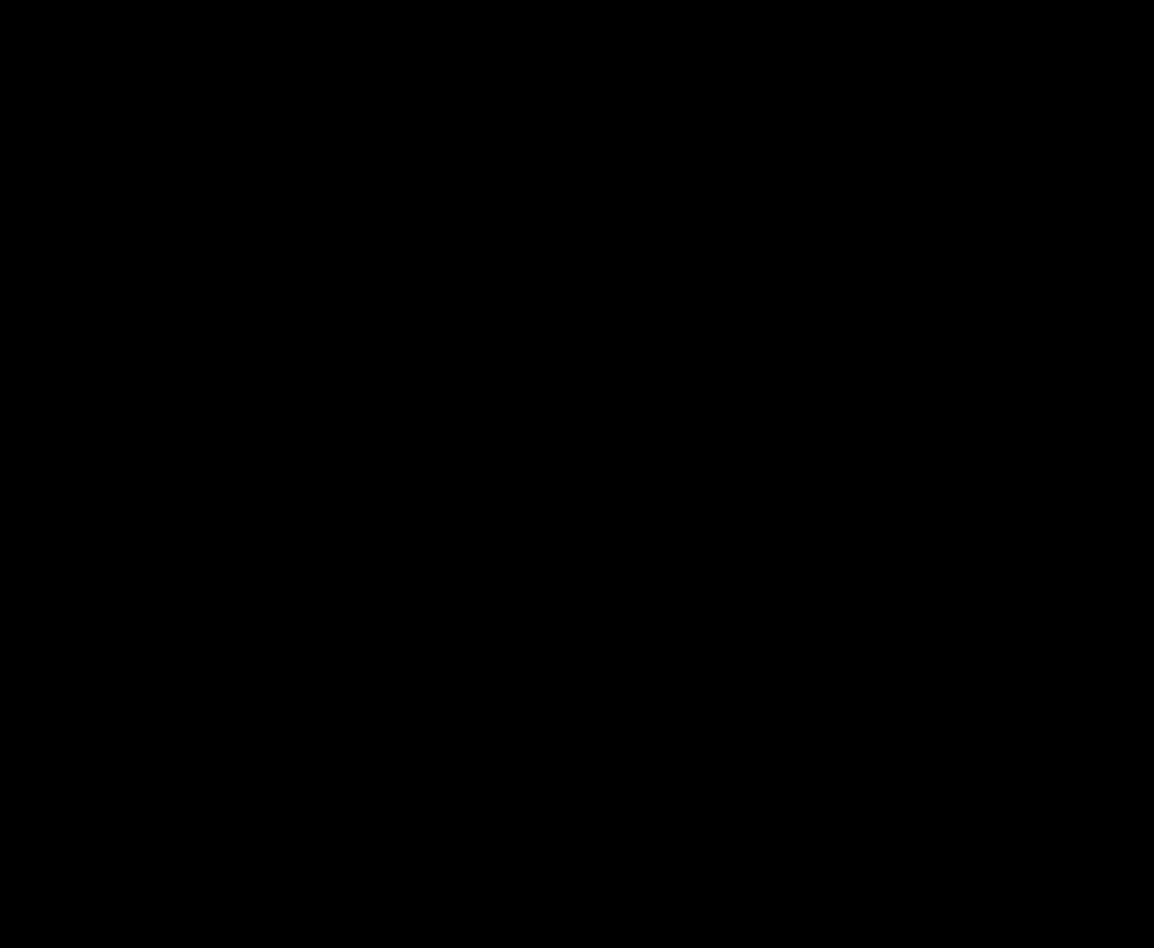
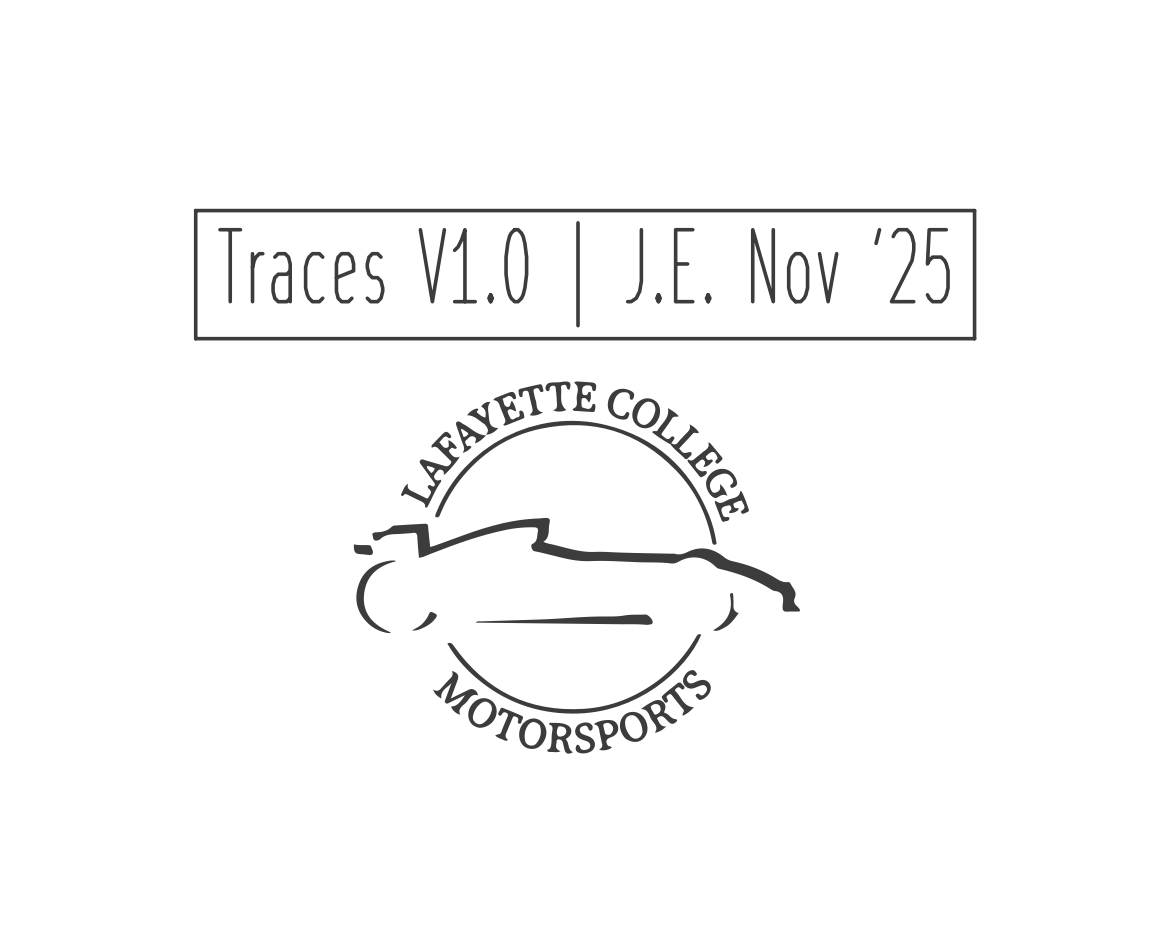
line: none -> (195, 210) (974, 210) (974, 338) (195, 338) (195, 210)
text: none -> Traces V1.0 | J.E. Nov '25 (583, 274)
drawing: none -> [353, 381, 801, 754]

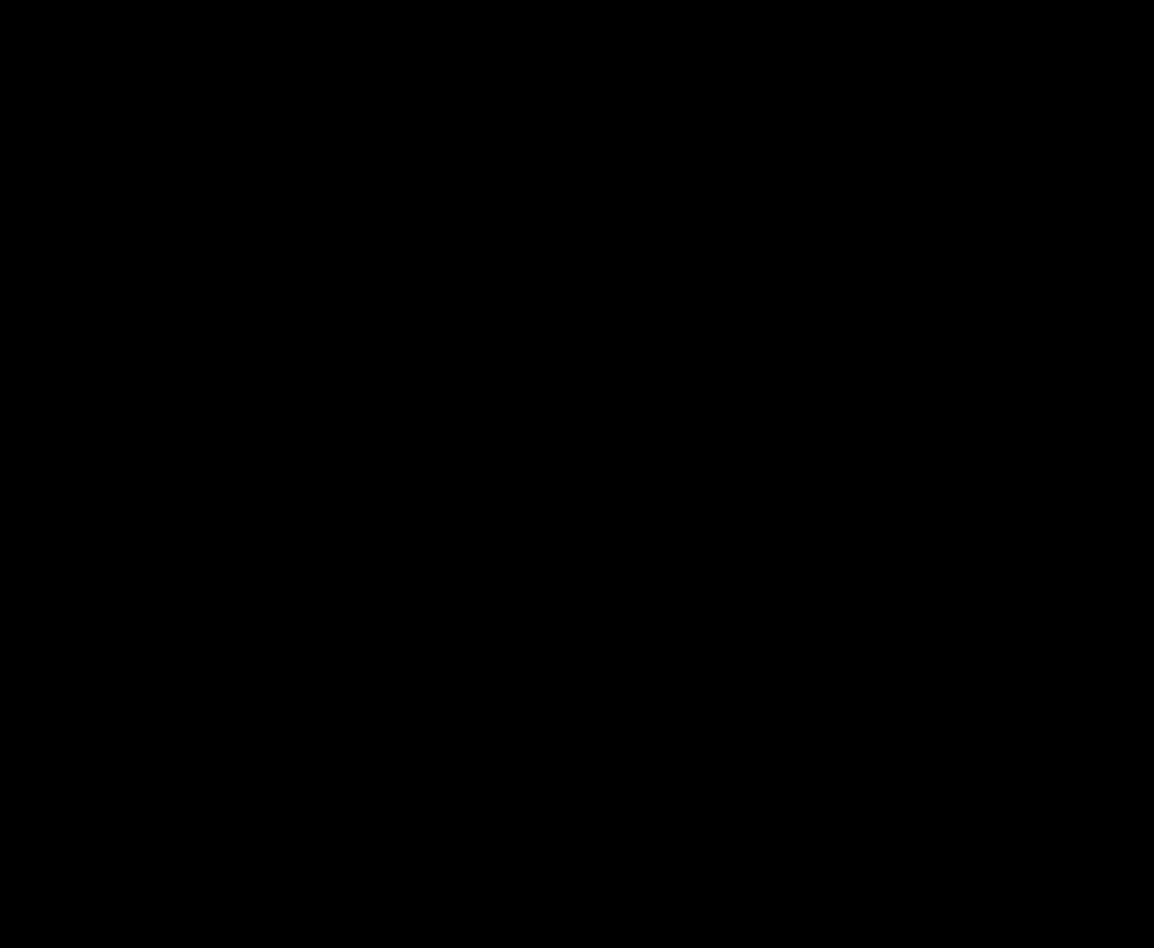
line: (195, 210) (974, 210) (974, 338) (195, 338) (195, 210) -> none
text: Traces V1.0 | J.E. Nov '25 (583, 274) -> none
drawing: [353, 381, 801, 754] -> none

